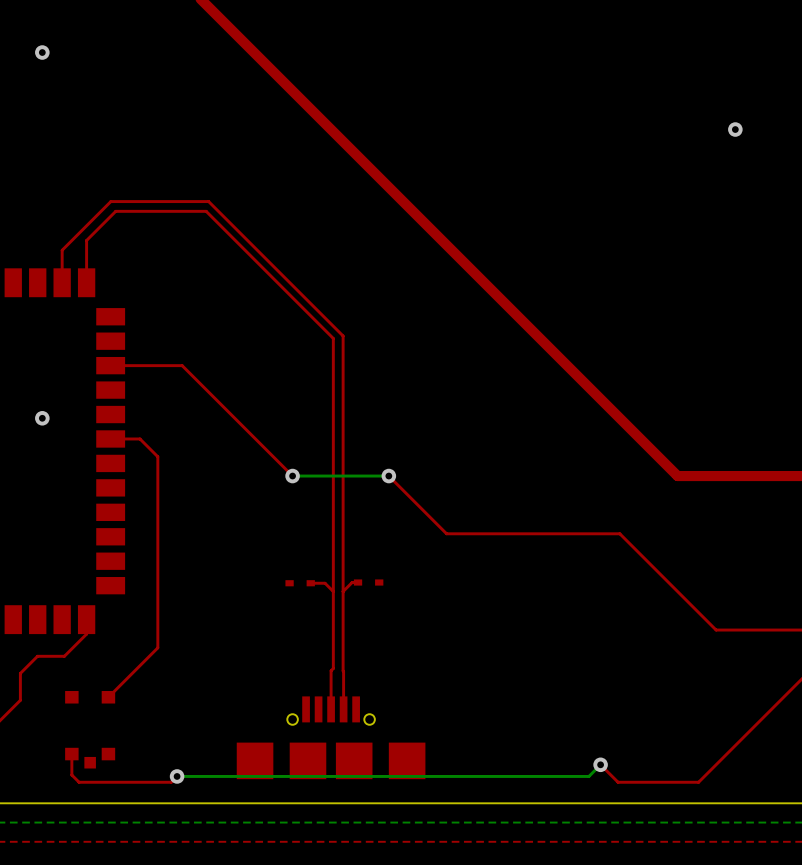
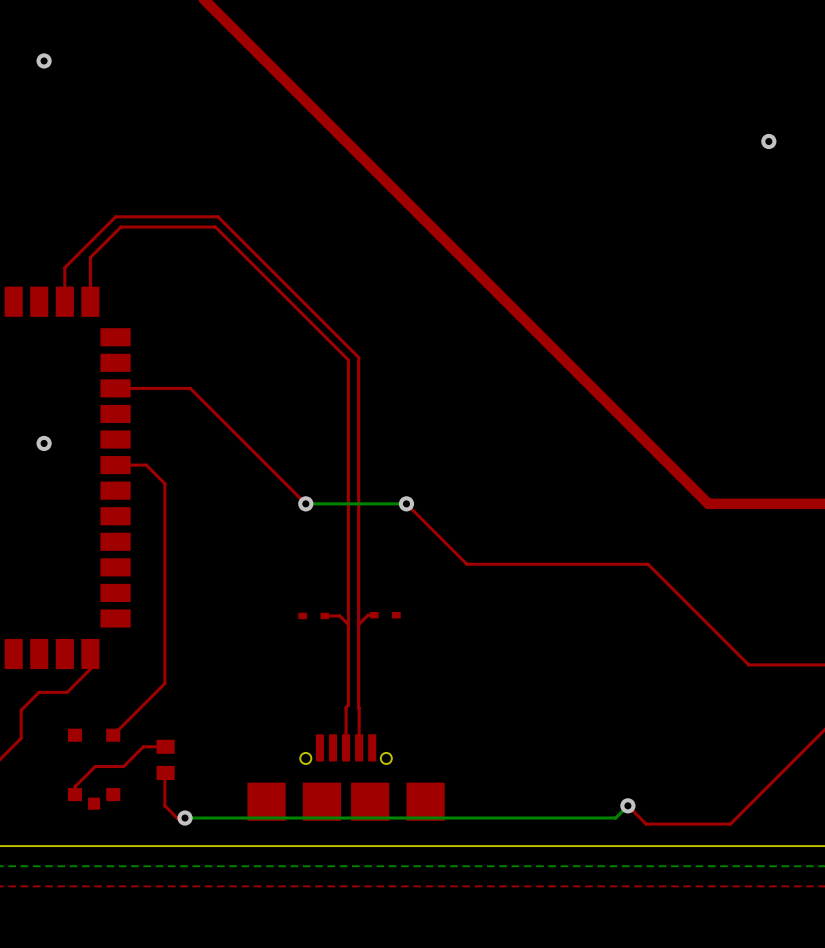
part: none -> (165, 759)
top track: none -> (165, 772) (164, 805) (177, 818) (185, 818)
top track: (71, 754) (71, 775) (79, 782) (171, 782) (177, 776) -> (74, 794) (74, 786) (95, 766) (123, 766) (143, 746) (165, 746)

